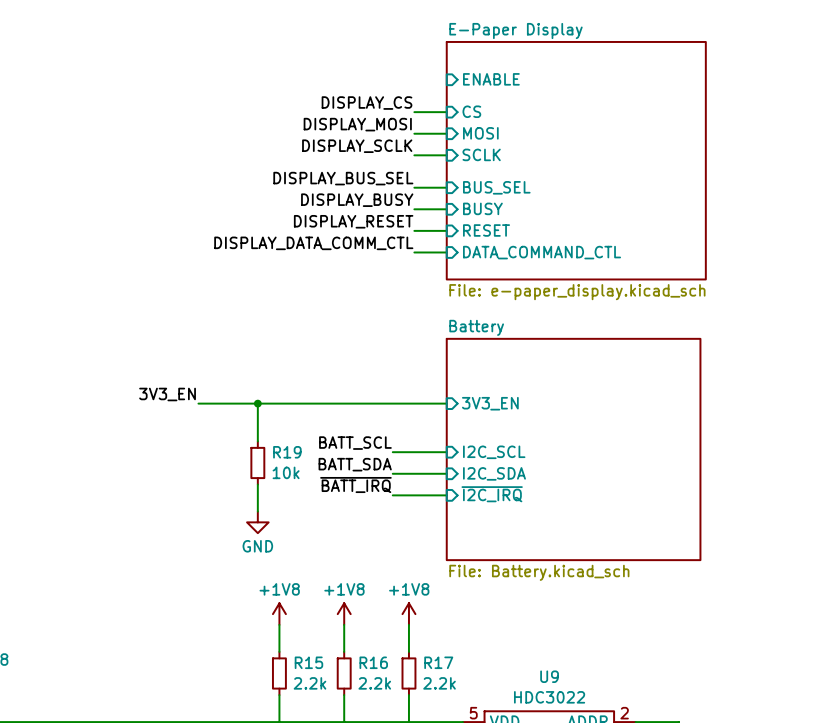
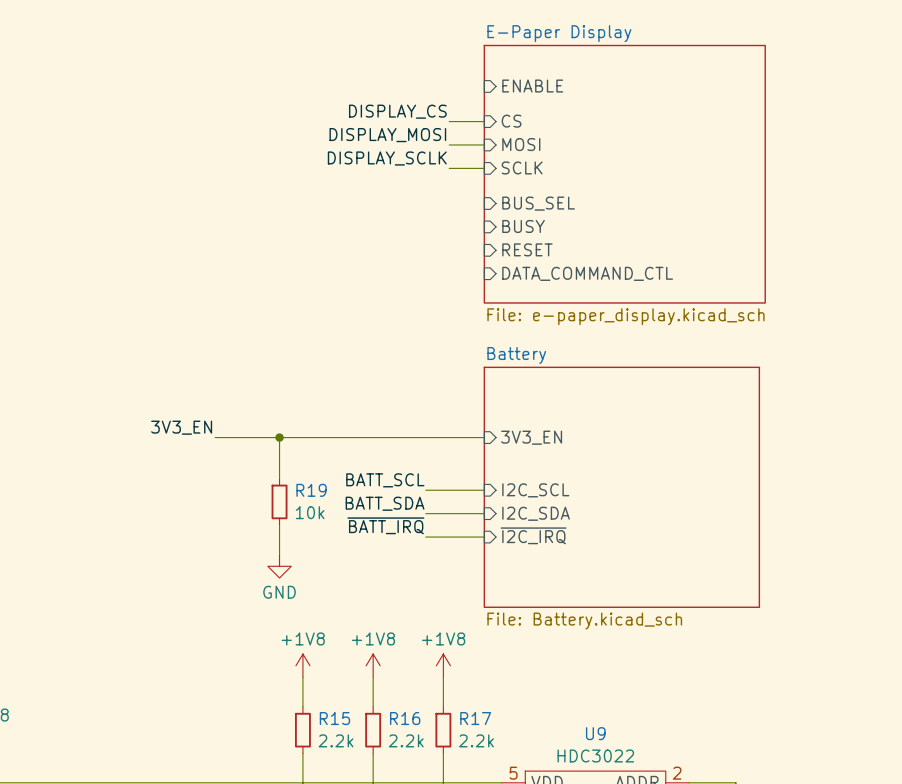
label: DISPLAY_BUS_SEL (343, 178) -> none
wire: (414, 187) (446, 187) -> none
label: DISPLAY_BUSY (357, 200) -> none
wire: (414, 209) (446, 209) -> none
label: DISPLAY_RESET (353, 221) -> none
wire: (414, 230) (446, 230) -> none
label: DISPLAY_DATA_COMM_CTL (313, 243) -> none
wire: (414, 252) (446, 252) -> none

